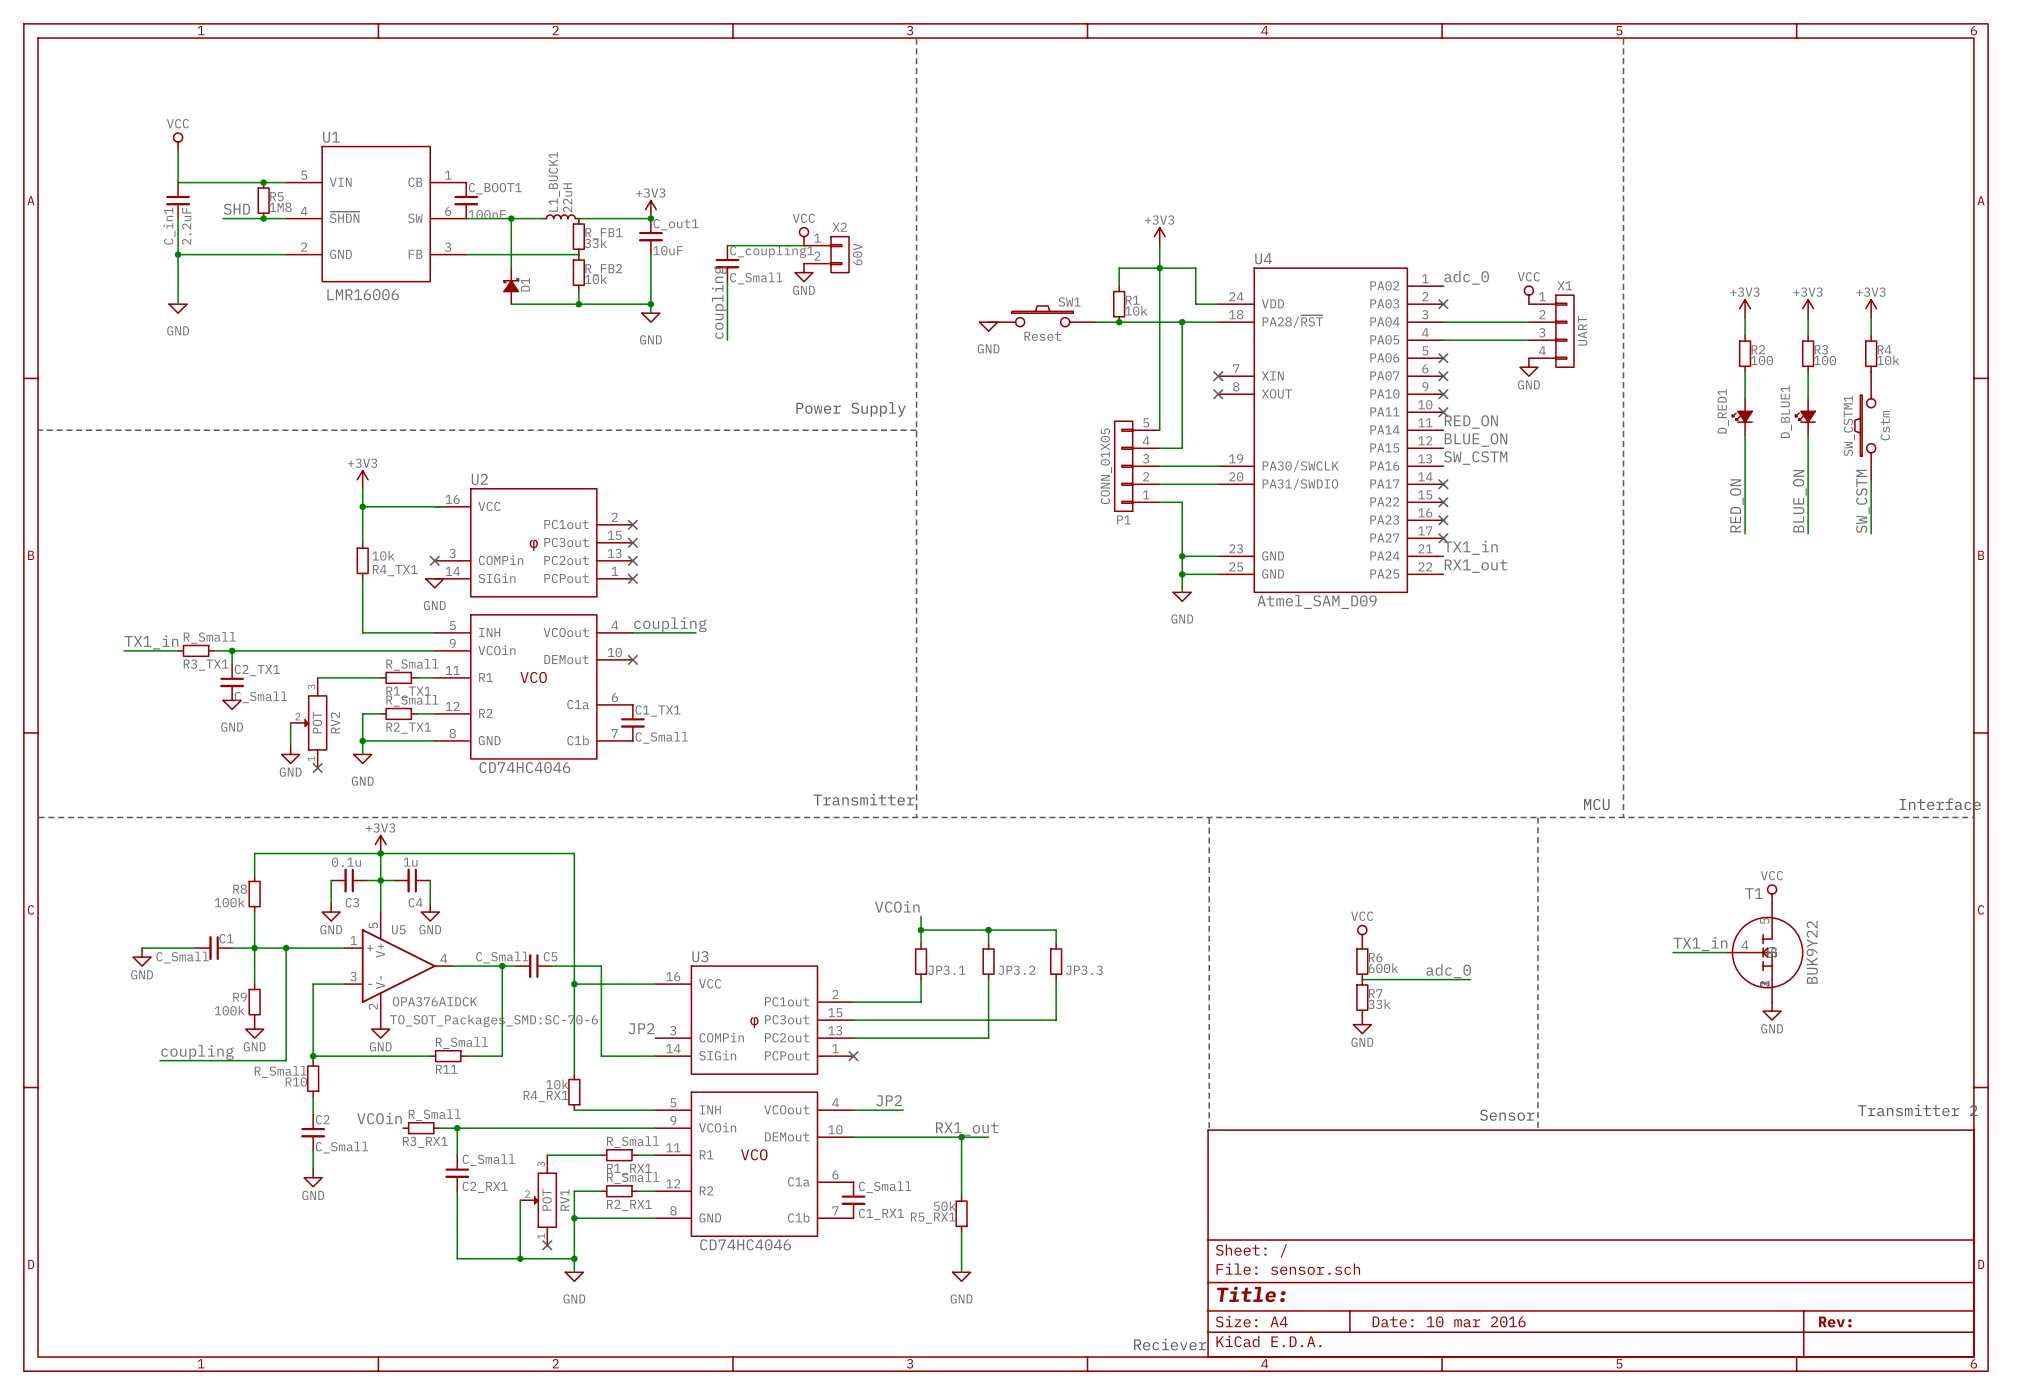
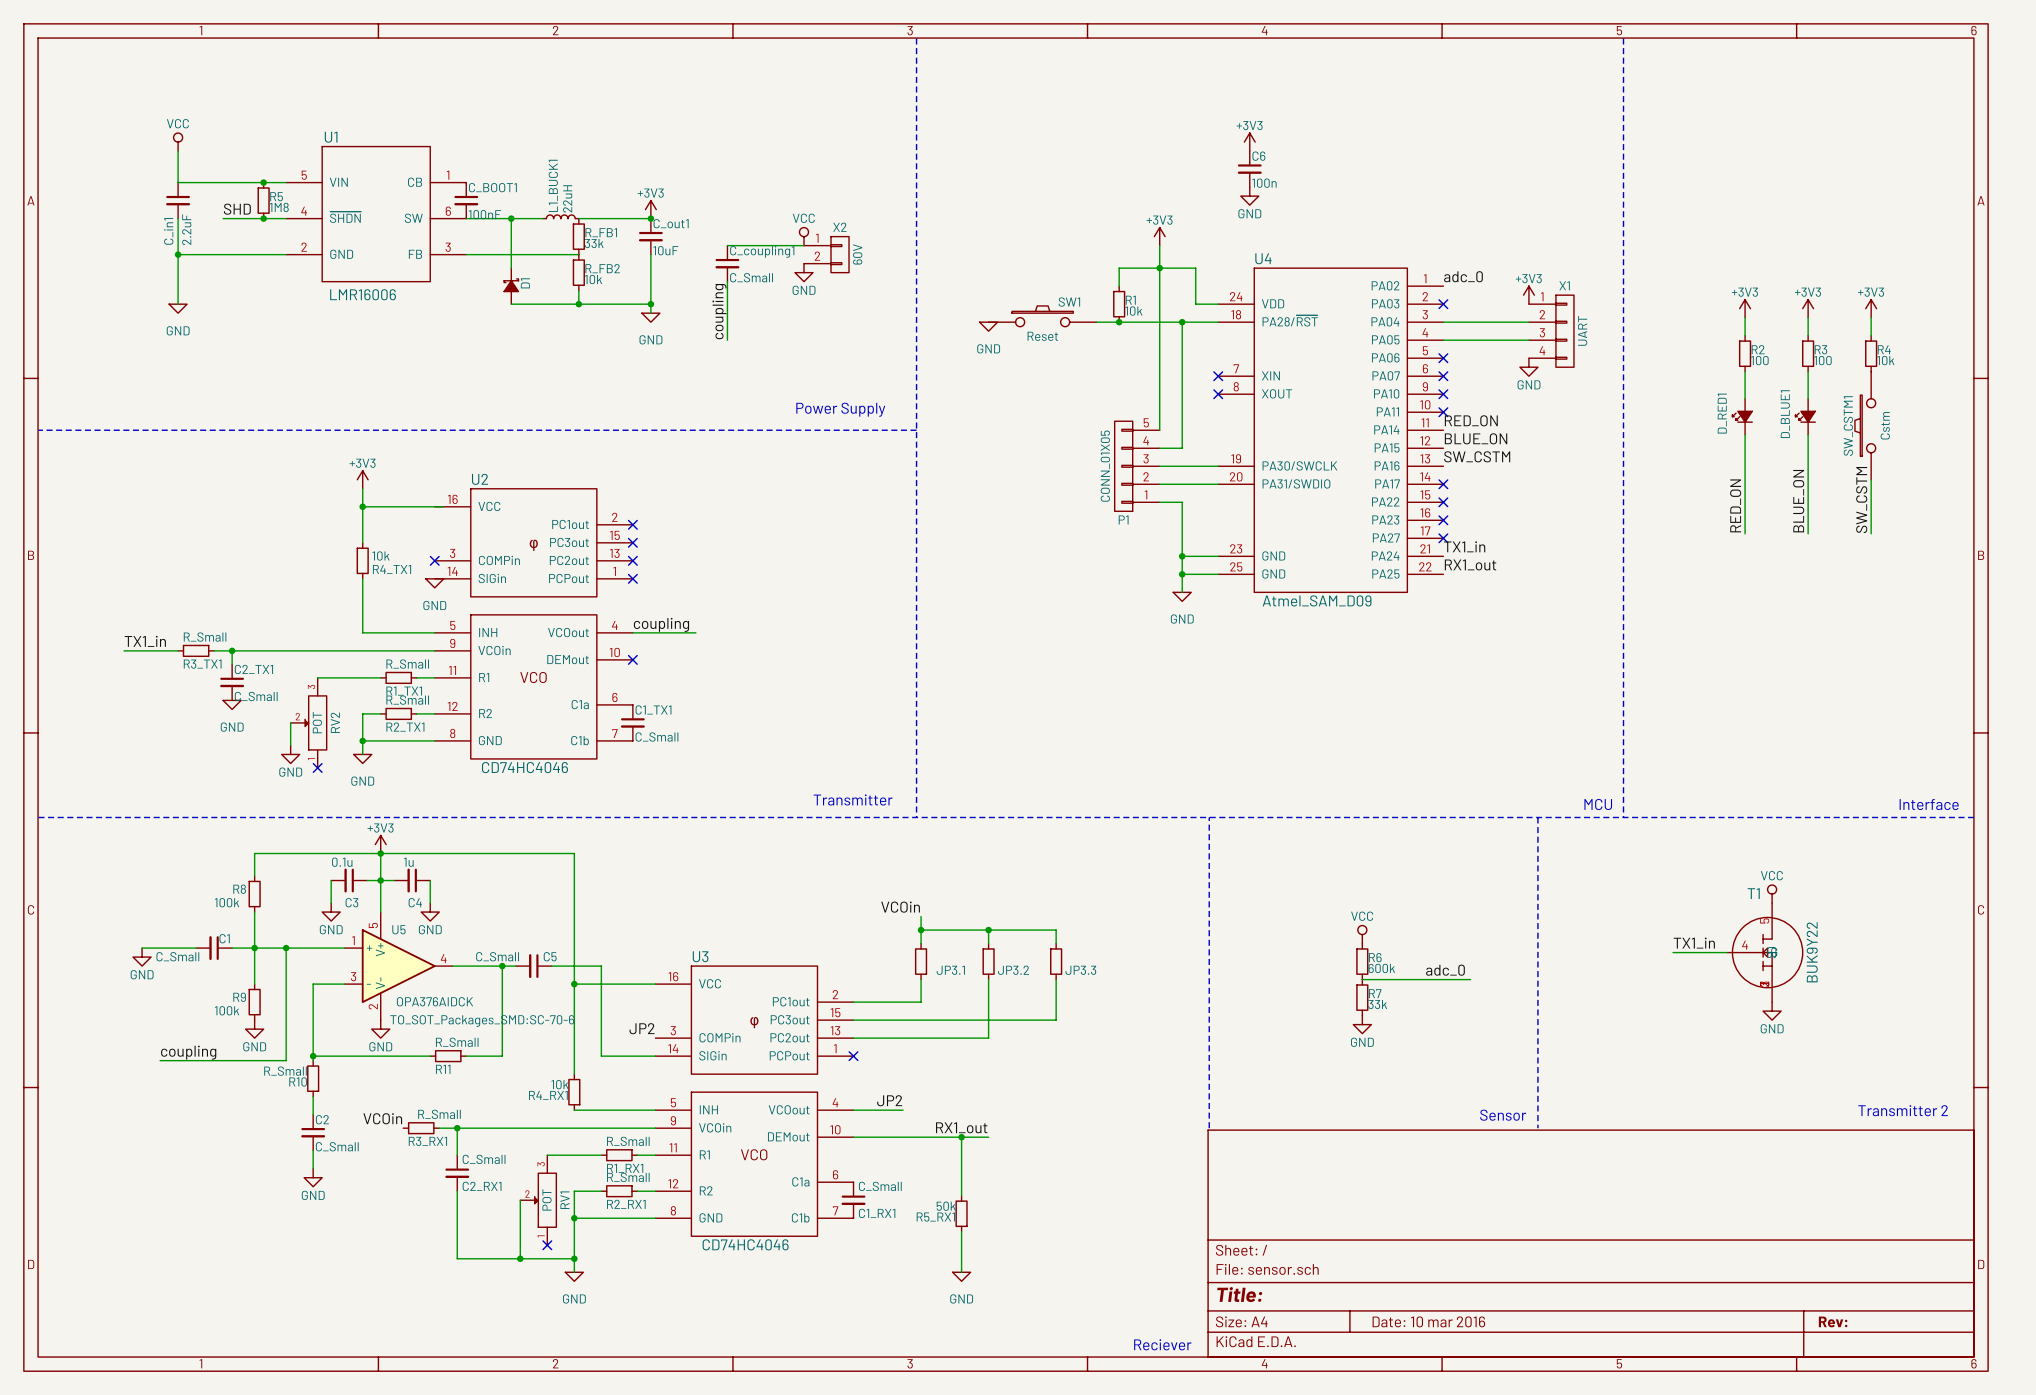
power symbol: none -> +3V3 (1249, 142)
C6: none -> 100n (1249, 169)
power symbol: none -> GND (1249, 196)
power symbol: VCC (1528, 295) -> +3V3 (1528, 295)

